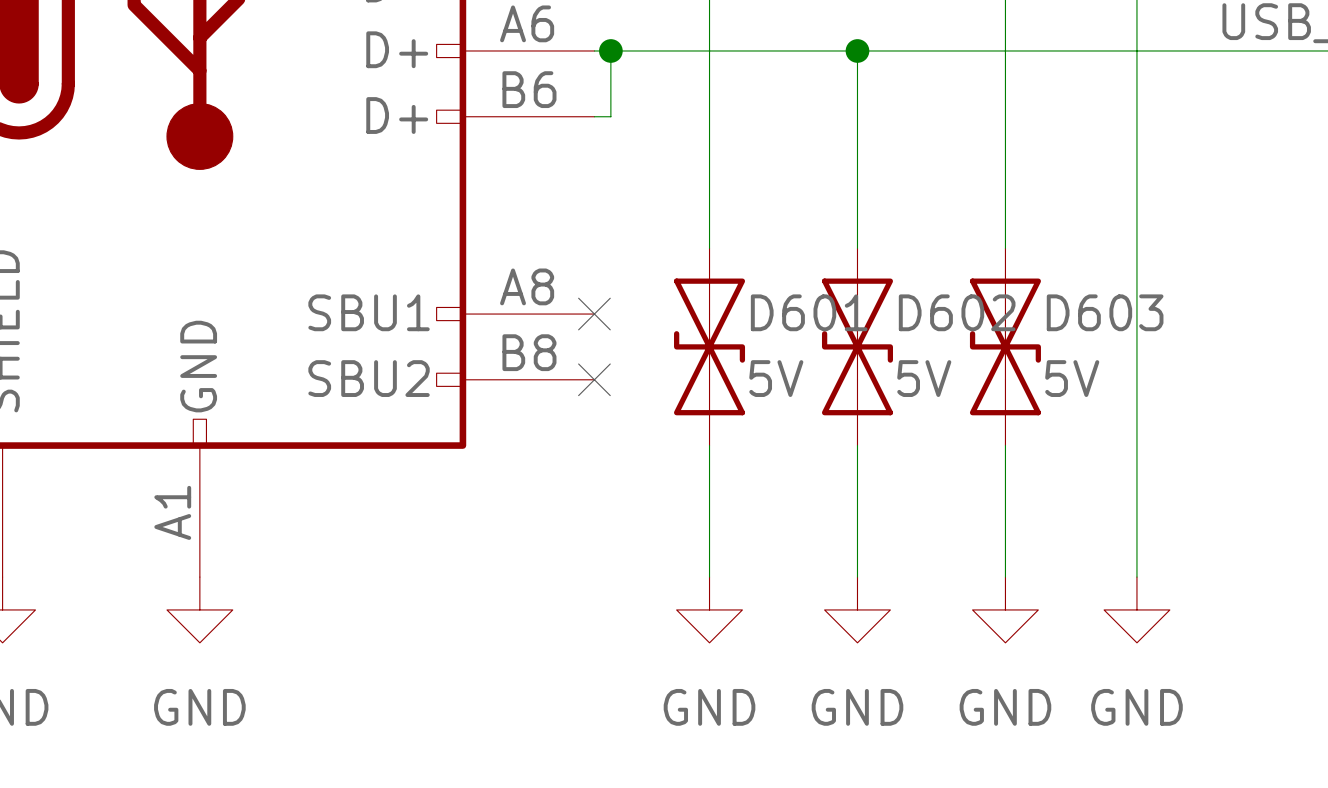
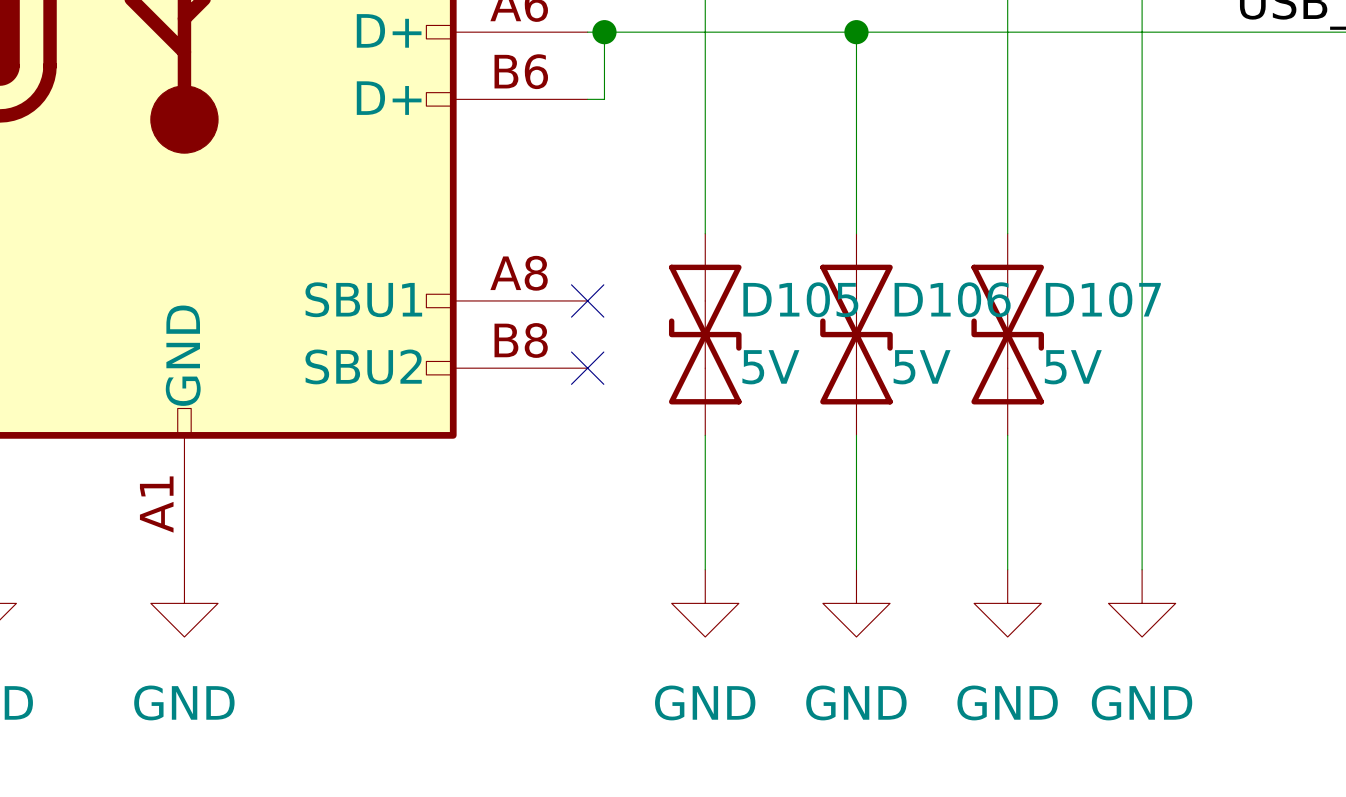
D601 name: D601 (809, 312) -> D105 (800, 299)
D602 name: D602 (957, 312) -> D106 (952, 299)
D603 name: D603 (1105, 312) -> D107 (1103, 299)

